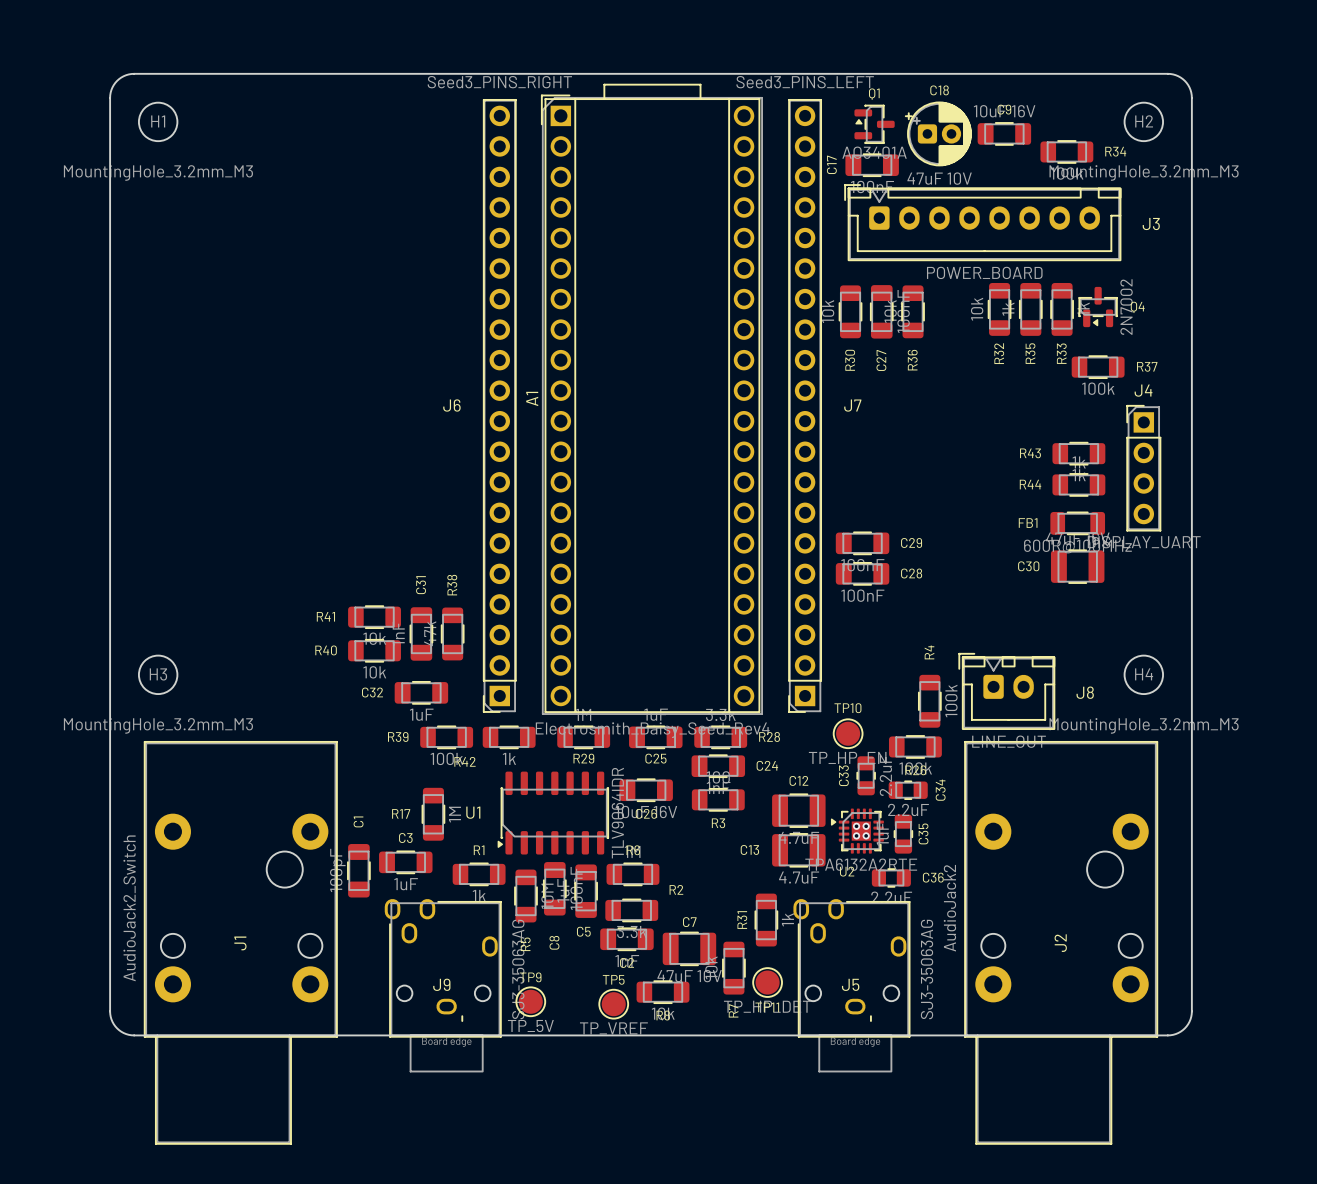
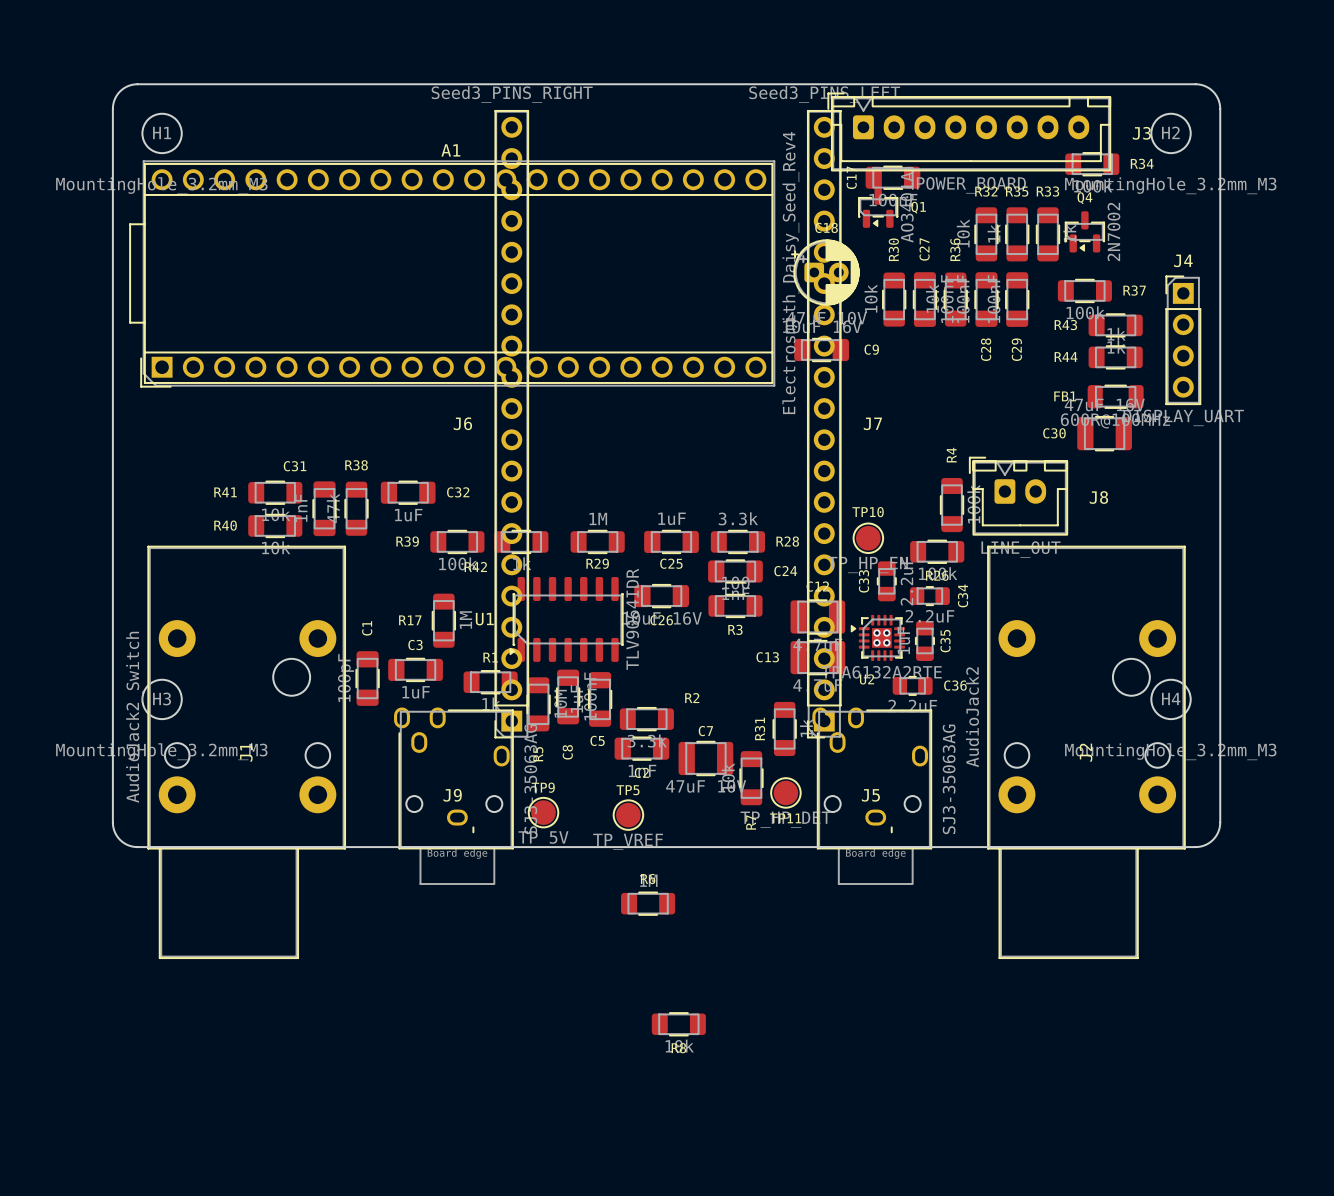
Q1 name position: Q1 (874, 94) -> Q1 (918, 207)
C9 name position: C9 (1004, 109) -> C9 (871, 349)
Q1 rotation: 0° (874, 124) -> 90° counterclockwise (878, 207)
Q1 position: (874, 124) -> (878, 207)
C18 position: (938, 133) -> (825, 272)
C9 position: (1004, 133) -> (821, 350)
J3 position: (982, 222) -> (969, 131)
Q4 position: (1098, 307) -> (1084, 231)
Q4 name position: Q4 (1137, 307) -> Q4 (1084, 198)
R32 position: (999, 309) -> (986, 234)
R35 position: (1030, 309) -> (1017, 234)
R33 position: (1062, 309) -> (1047, 234)
R30 position: (850, 311) -> (894, 299)
C27 position: (881, 311) -> (924, 299)
R36 position: (913, 311) -> (955, 299)
R32 name rotation: 0° (999, 353) -> 90° clockwise (986, 191)
R32 name position: R32 (999, 353) -> R32 (986, 191)
R35 name rotation: 0° (1030, 353) -> 90° clockwise (1017, 191)
R35 name position: R35 (1030, 353) -> R35 (1017, 191)
R33 name rotation: 0° (1061, 353) -> 90° clockwise (1047, 191)
R33 name position: R33 (1061, 353) -> R33 (1047, 191)
R30 name position: R30 (850, 360) -> R30 (893, 249)
C27 name position: C27 (881, 360) -> C27 (924, 249)
R36 name position: R36 (912, 360) -> R36 (955, 249)
R37 position: (1098, 367) -> (1084, 290)
A1 name position: A1 (532, 398) -> A1 (450, 150)
A1 rotation: 0° (651, 399) -> 90° counterclockwise (452, 274)
R43 position: (1078, 453) -> (1115, 325)
J4 position: (1143, 468) -> (1183, 340)
R44 position: (1078, 484) -> (1115, 357)
FB1 position: (1077, 523) -> (1115, 396)
C29 rotation: 0° (862, 543) -> 90° clockwise (1017, 299)
C29 position: (862, 543) -> (1017, 299)
C30 position: (1077, 566) -> (1104, 433)
C28 rotation: 0° (862, 573) -> 90° clockwise (986, 299)
C28 position: (862, 573) -> (986, 299)
C31 name rotation: 0° (421, 585) -> 90° clockwise (295, 466)
R38 name rotation: 0° (452, 585) -> 90° clockwise (356, 465)
via: none -> (876, 633)
via: none -> (886, 633)
R41 position: (374, 617) -> (275, 492)
via: none -> (876, 642)
via: none -> (886, 642)
C31 position: (421, 633) -> (324, 508)
R38 position: (452, 633) -> (356, 508)
R40 position: (374, 650) -> (275, 525)
J8 position: (1006, 691) -> (1018, 496)
C32 name position: C32 (372, 692) -> C32 (458, 492)
C32 position: (421, 692) -> (408, 492)
R4 position: (929, 701) -> (952, 505)
TP10 position: (848, 733) -> (868, 538)
R39 position: (446, 737) -> (457, 541)
R42 position: (509, 737) -> (521, 541)
R29 position: (583, 737) -> (597, 541)
C25 position: (655, 737) -> (671, 541)
R28 position: (720, 737) -> (737, 541)
R26 position: (915, 746) -> (937, 551)
C24 position: (718, 766) -> (735, 571)
C33 position: (866, 775) -> (886, 581)
C26 position: (646, 790) -> (661, 596)
C34 position: (908, 790) -> (929, 596)
board edge: (110, 795) (110, 1014) (112, 1021) (119, 1030) (134, 1035) (1173, 1034) (1184, 1028) (1191, 1014) (1191, 795) -> (112, 822) (114, 830) (120, 839) (129, 845) (137, 847) (1195, 847) (1203, 845) (1213, 839) (1218, 830) (1220, 822)
R3 position: (718, 799) -> (735, 605)
C12 position: (798, 810) -> (817, 617)
U1 position: (553, 813) -> (566, 619)
R17 position: (433, 814) -> (443, 620)
via: (856, 826) -> none
via: (866, 826) -> none
U2 position: (857, 831) -> (877, 637)
C35 position: (903, 834) -> (924, 641)
via: (856, 835) -> none
via: (866, 835) -> none
C13 position: (798, 850) -> (817, 657)
C3 position: (405, 862) -> (415, 669)
C1 position: (358, 870) -> (367, 678)
R1 position: (479, 874) -> (490, 682)
C36 position: (891, 877) -> (912, 685)
C8 position: (554, 888) -> (568, 696)
C5 position: (586, 891) -> (600, 699)
R5 position: (525, 896) -> (538, 704)
R2 position: (631, 910) -> (646, 719)
R31 position: (766, 920) -> (784, 728)
C2 position: (626, 939) -> (641, 748)
J1 position: (240, 942) -> (246, 752)
J2 position: (1061, 942) -> (1086, 752)
C7 position: (689, 948) -> (705, 758)
R7 position: (733, 968) -> (751, 778)
TP11 position: (767, 982) -> (785, 792)
J9 position: (443, 985) -> (453, 796)
J5 position: (851, 985) -> (872, 796)
TP9 position: (530, 1001) -> (543, 812)
TP5 position: (613, 1004) -> (628, 815)

